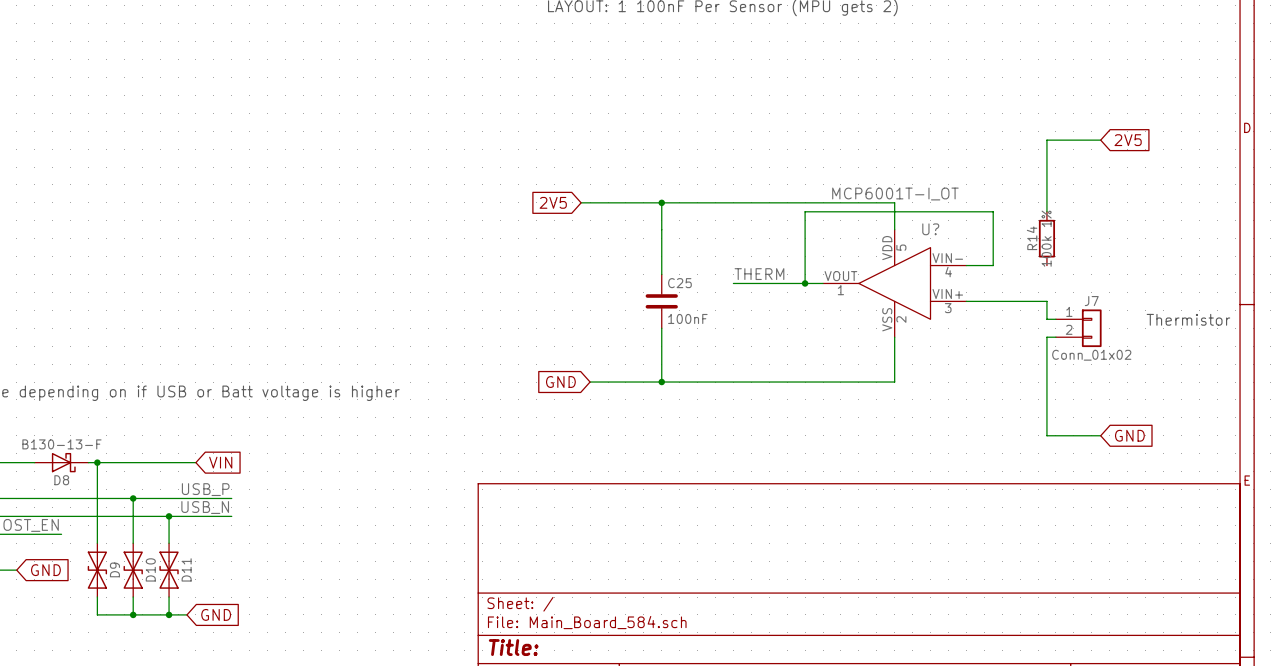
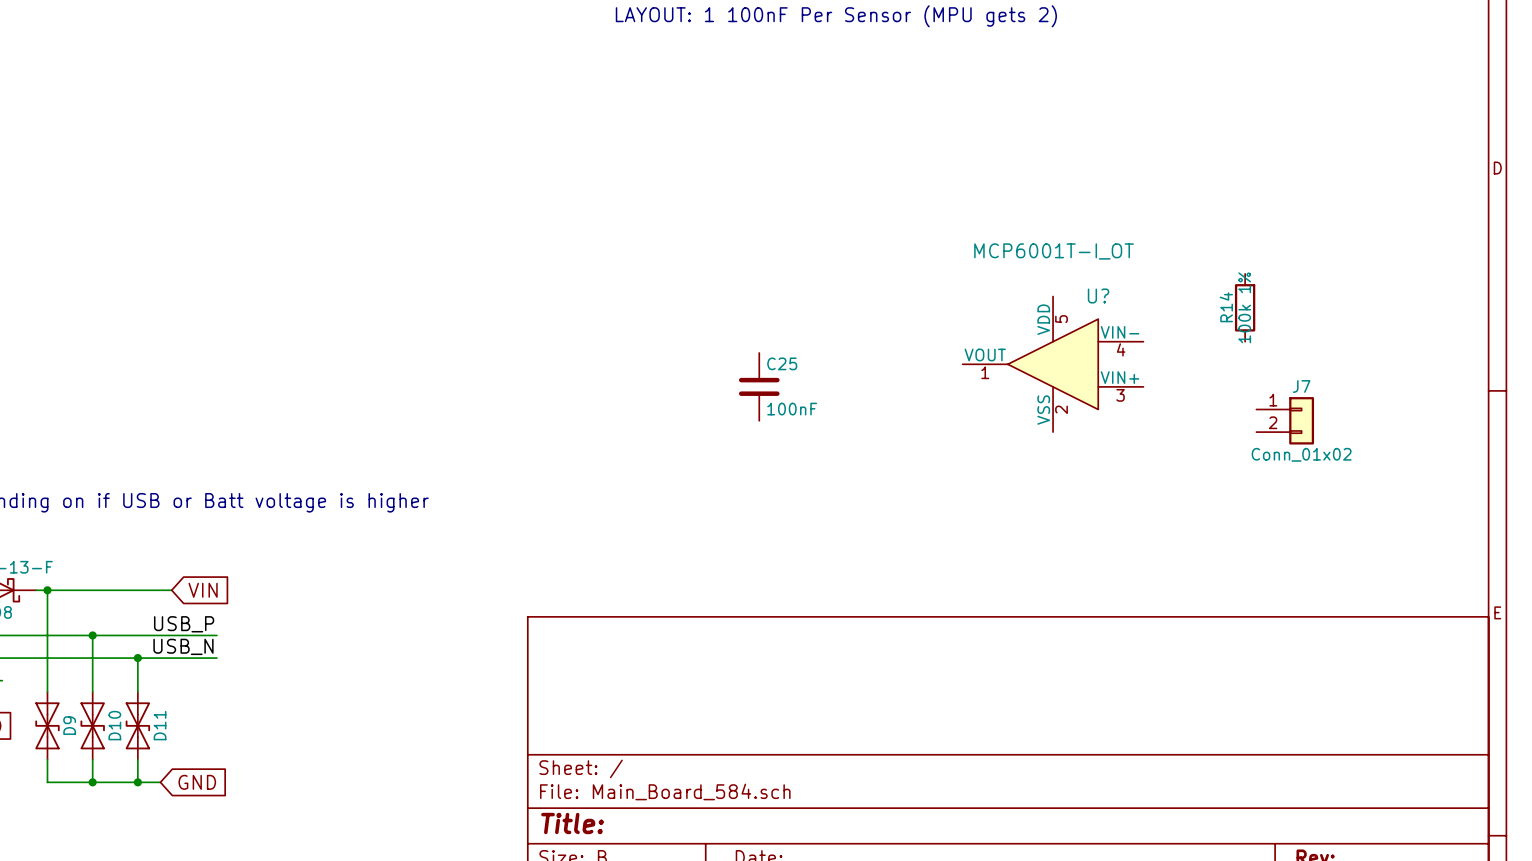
wire: (1100, 140) (1046, 140) (1046, 211) -> none
global label: 2V5 (1128, 140) -> none
global label: 2V5 (553, 202) -> none
wire: (581, 202) (894, 202) (894, 229) -> none
wire: (661, 202) (661, 274) -> none
junction: (661, 202) -> none
wire: (966, 265) (993, 265) (993, 211) (805, 211) (805, 283) -> none
label: THERM (759, 274) -> none
wire: (733, 283) (823, 283) -> none
junction: (805, 283) -> none
wire: (966, 301) (1046, 301) (1046, 319) (1055, 319) -> none
text: Thermistor (1188, 319) -> none
wire: (661, 328) (661, 382) -> none
wire: (894, 337) (894, 382) (590, 382) -> none
wire: (1055, 337) (1046, 337) (1046, 435) (1100, 435) -> none
global label: GND (560, 382) -> none
junction: (661, 382) -> none
global label: GND (1129, 435) -> none

